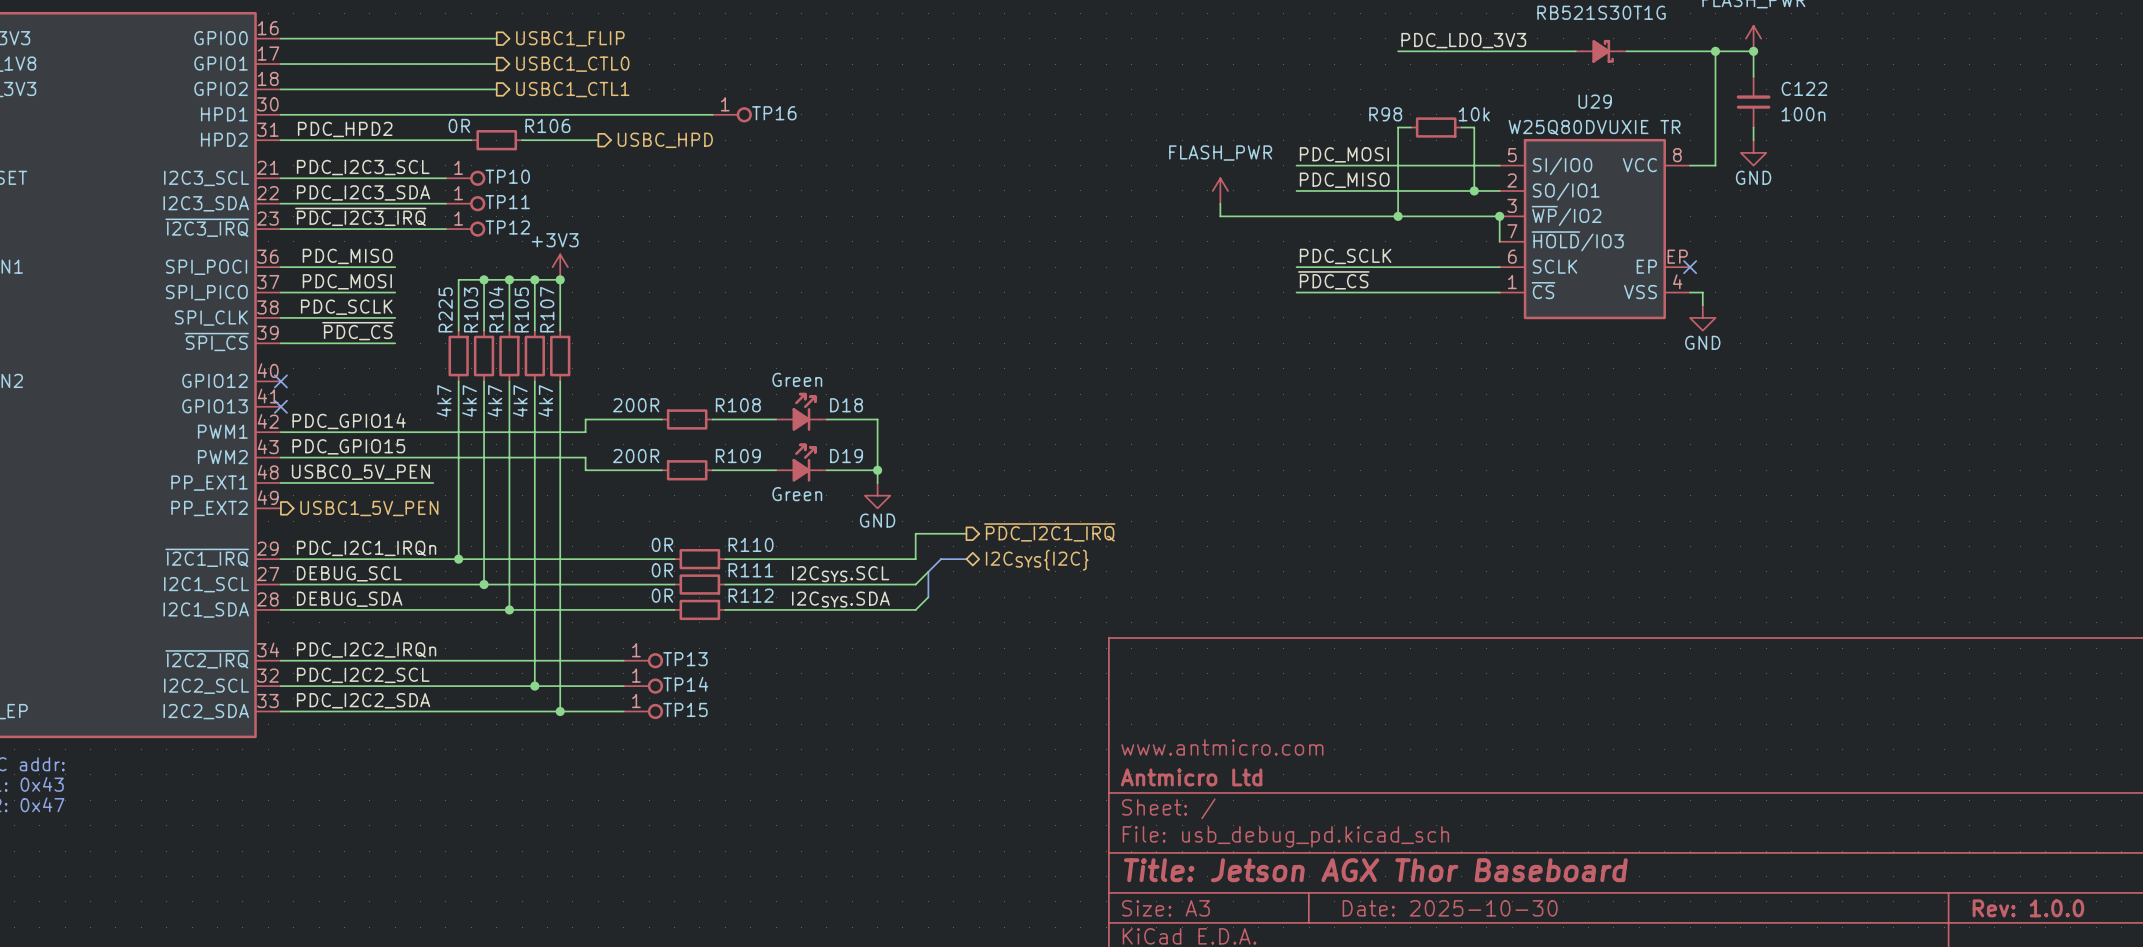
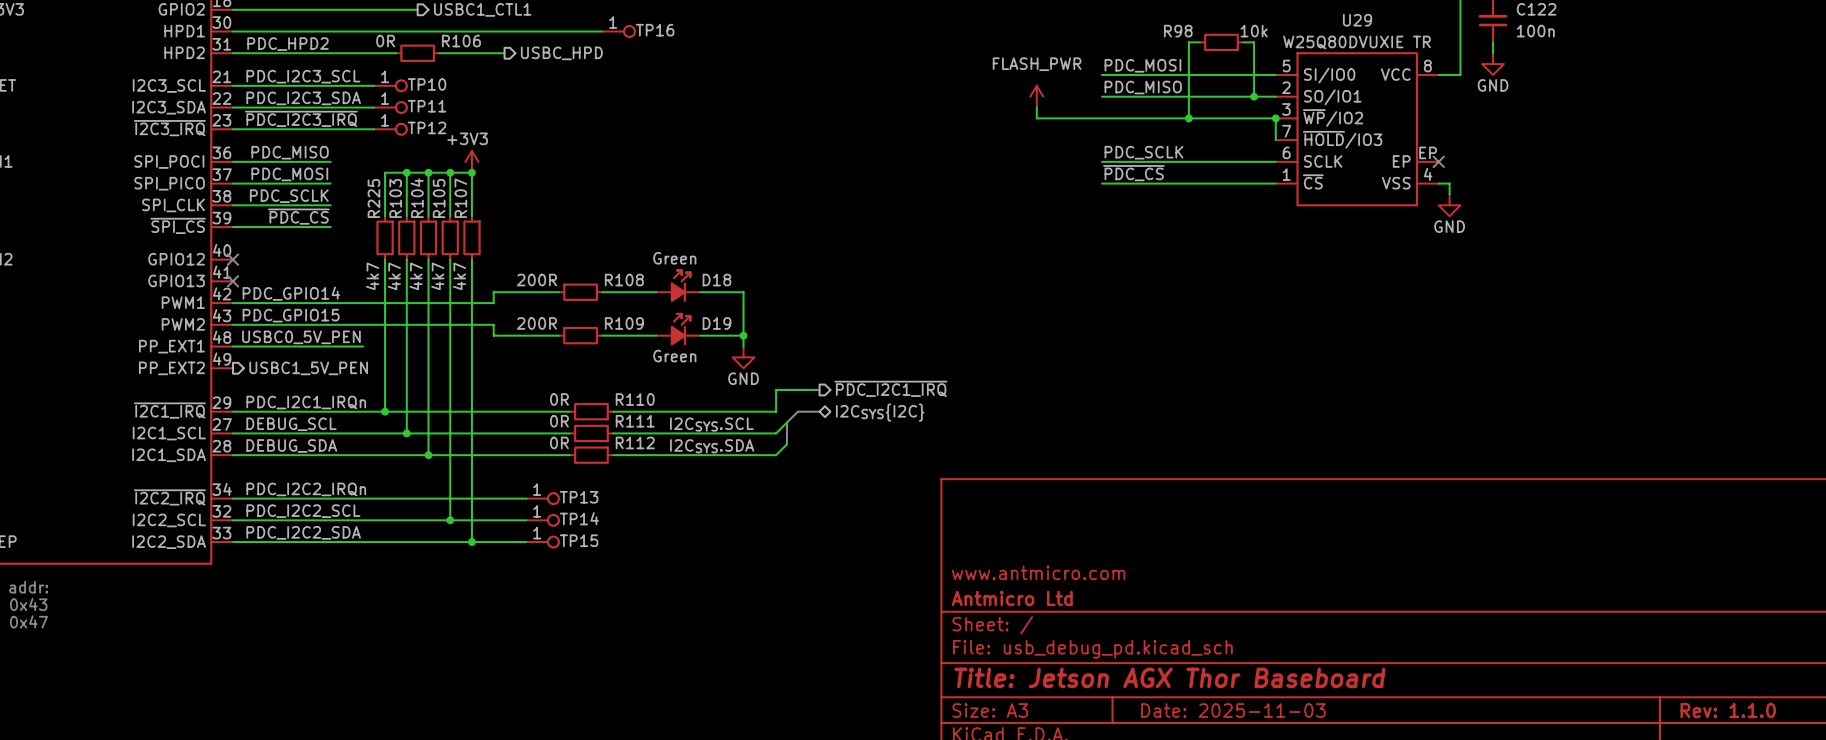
title block: Date: 2025-10-30 (1450, 908) -> Date: 2025-11-03 (1233, 710)
title block: Rev: 1.0.0 (2028, 908) -> Rev: 1.1.0 (1728, 710)

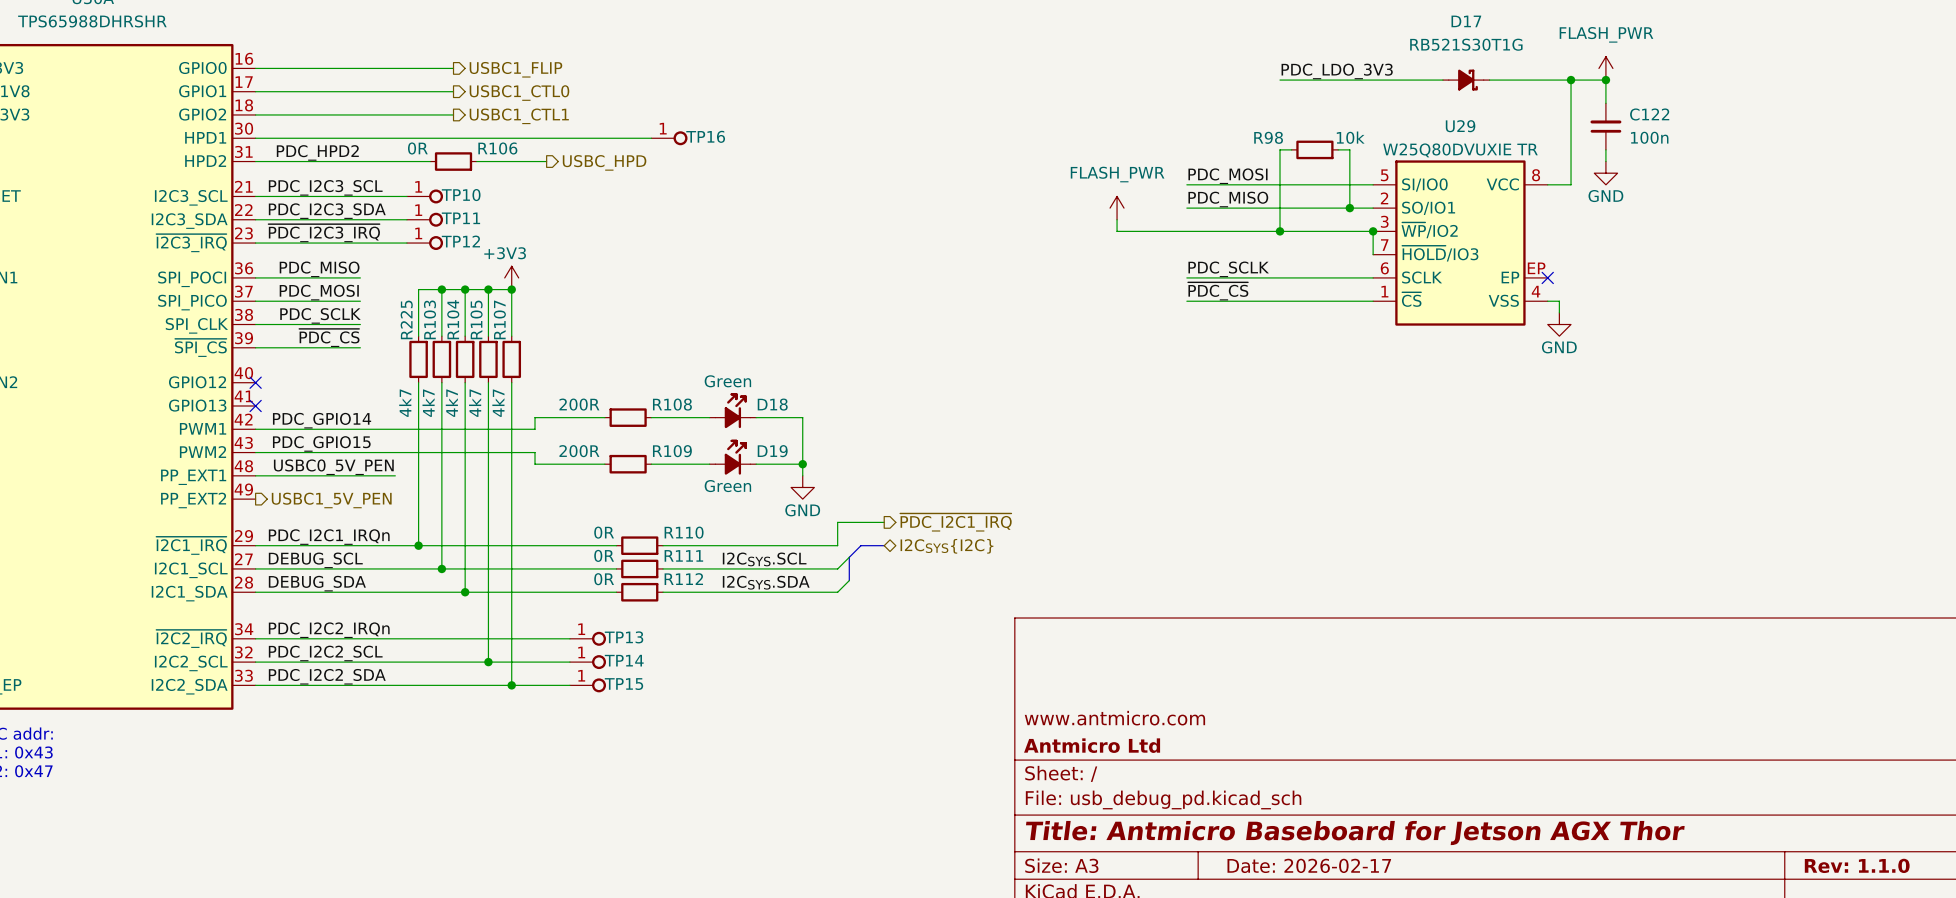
title block: Title: Jetson AGX Thor Baseboard (1169, 677) -> Title: Antmicro Baseboard for Jetson AGX Thor (1355, 833)
title block: Date: 2025-11-03 (1233, 710) -> Date: 2026-02-17 (1309, 865)

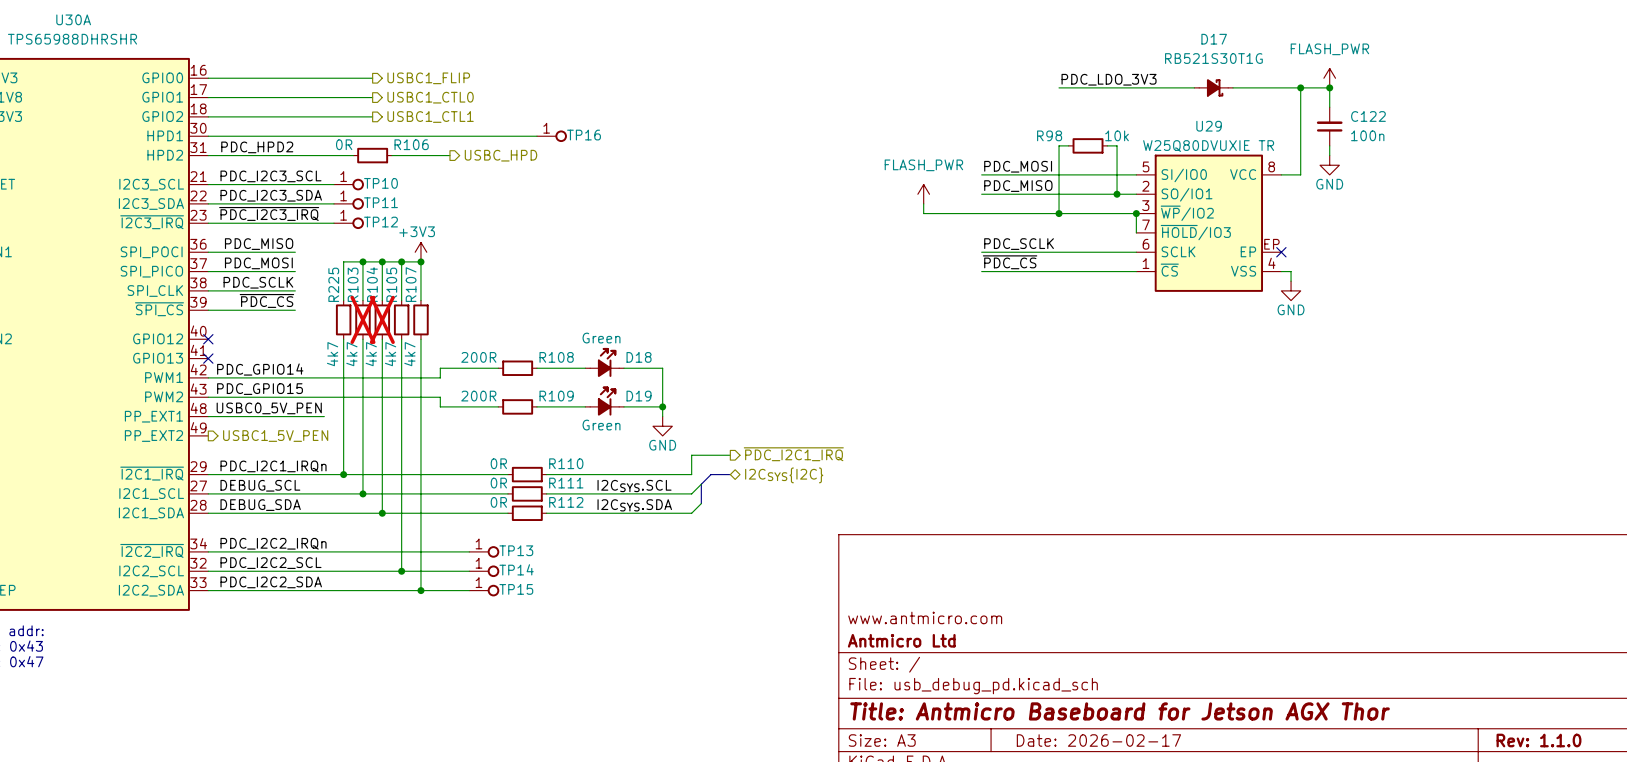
R103 do-not-place cross: none -> (362, 319)
R104 do-not-place cross: none -> (382, 319)

